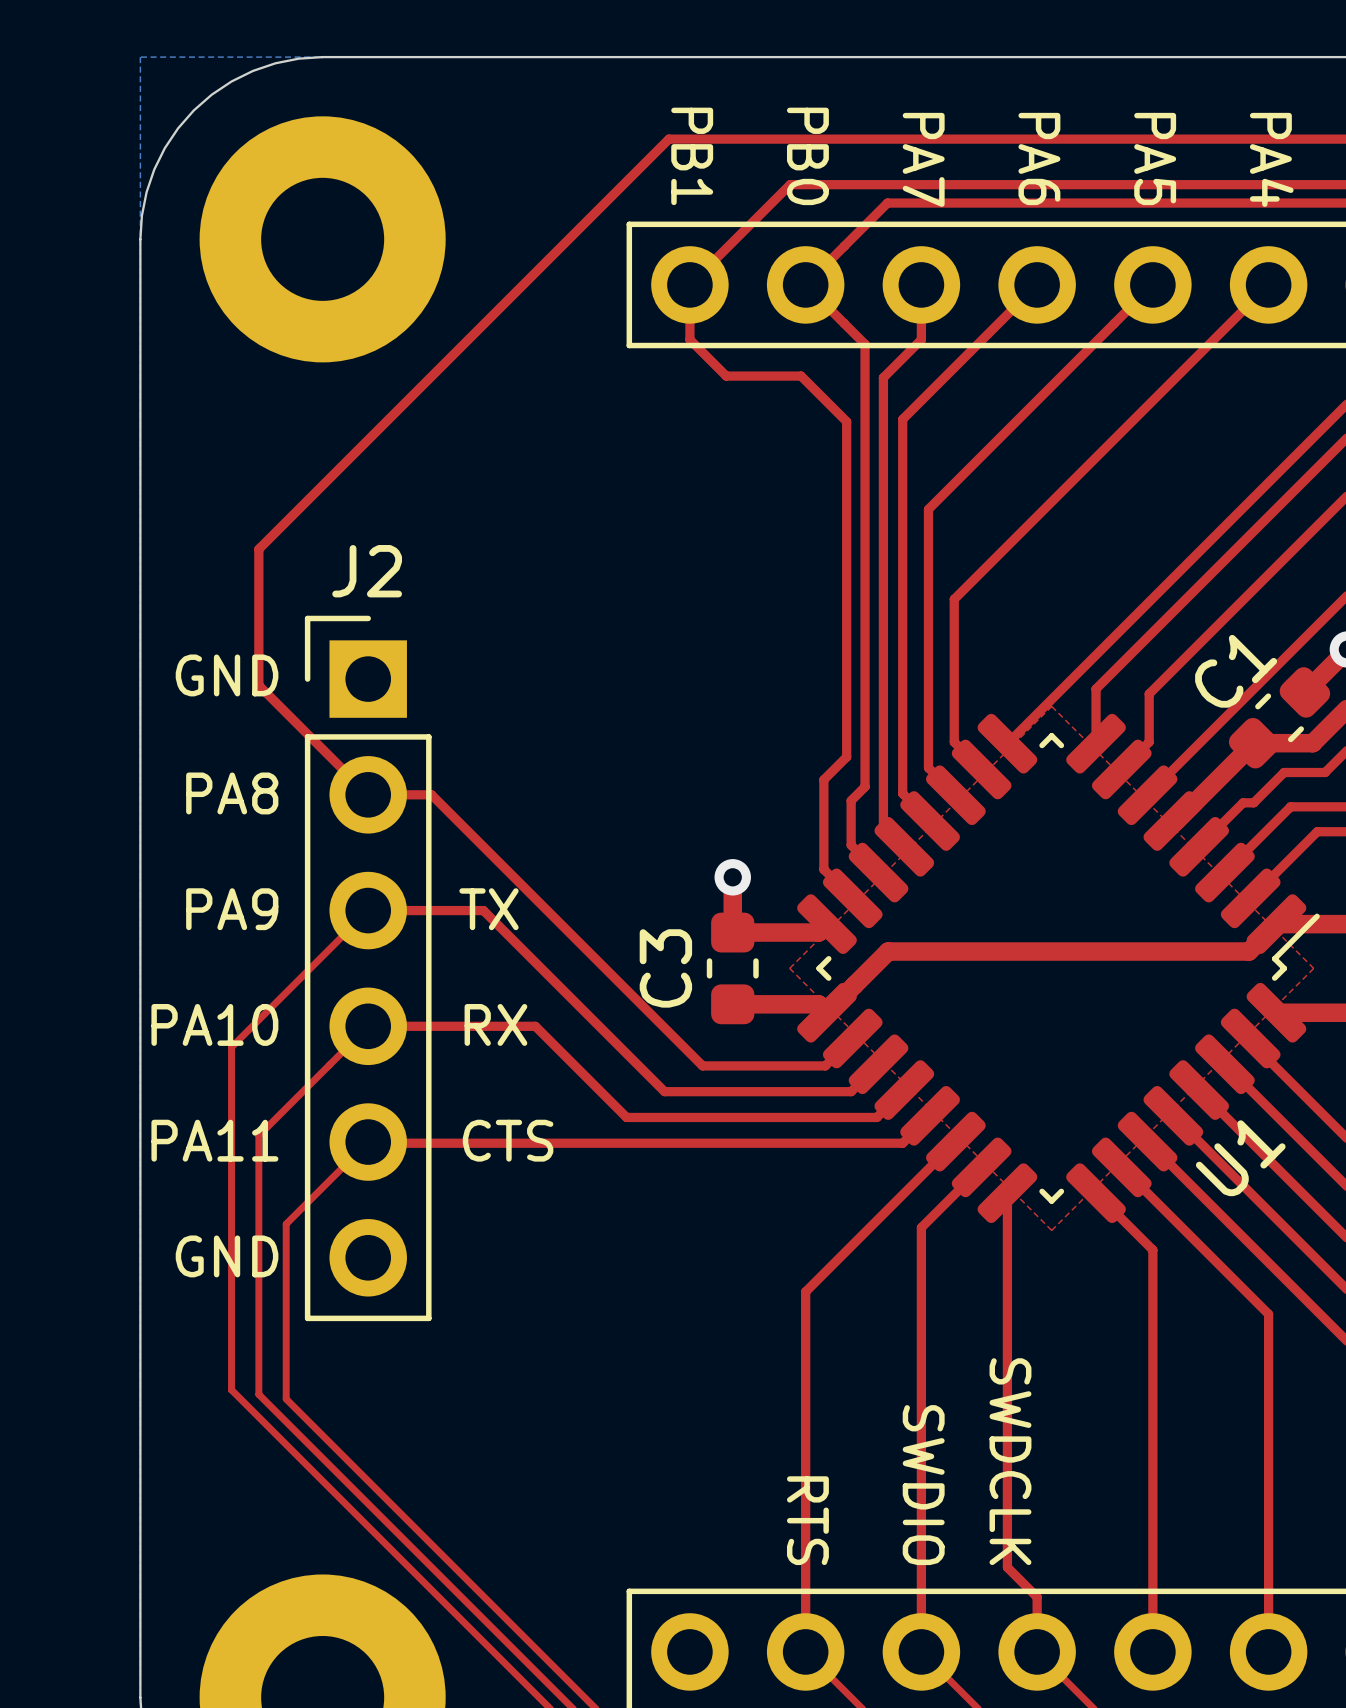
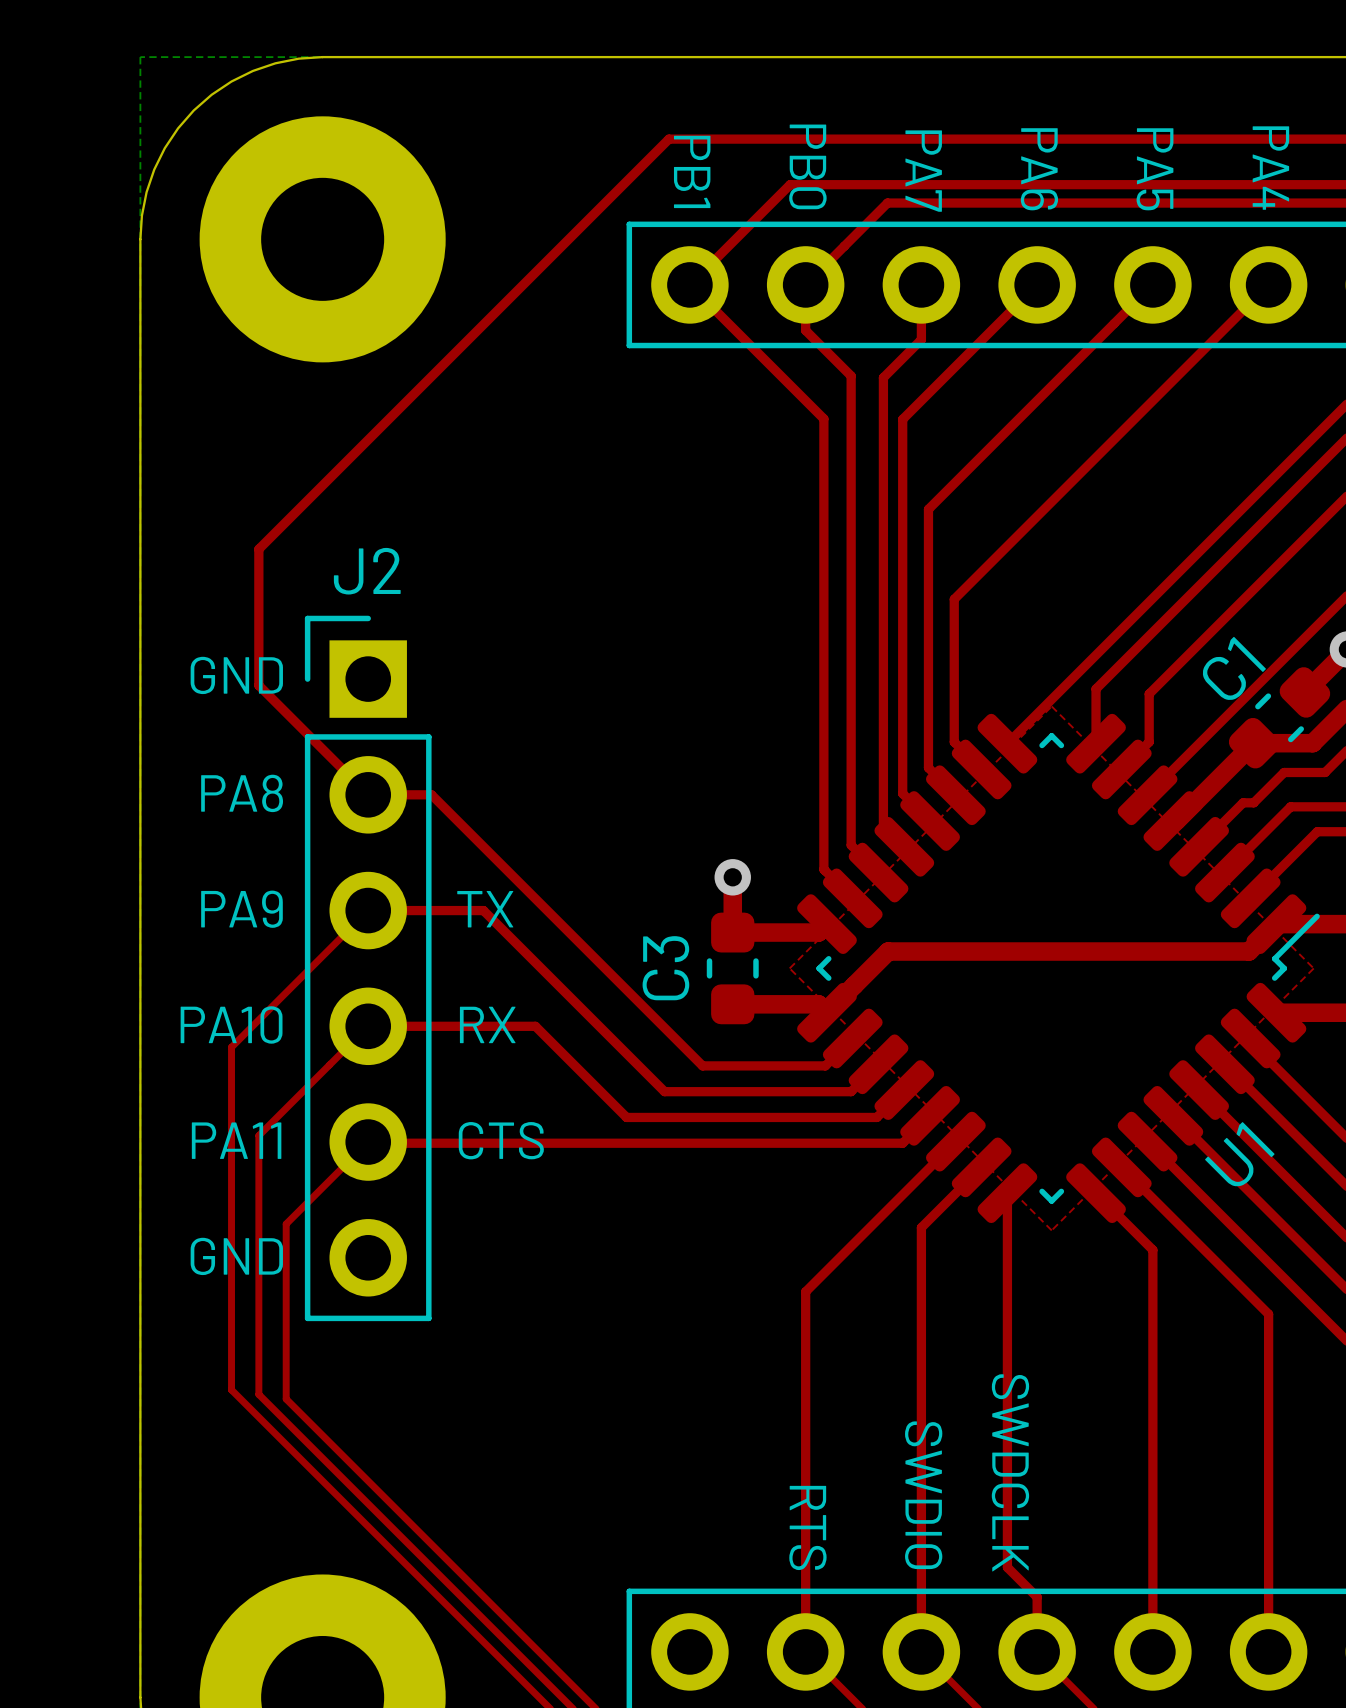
top track: (689, 284) (689, 339) (726, 376) (801, 376) (846, 421) (846, 757) (823, 779) -> (689, 284) (823, 418) (823, 779)
top track: (805, 284) (865, 344) (865, 786) (851, 800) -> (805, 284) (805, 330) (851, 375) (851, 800)

